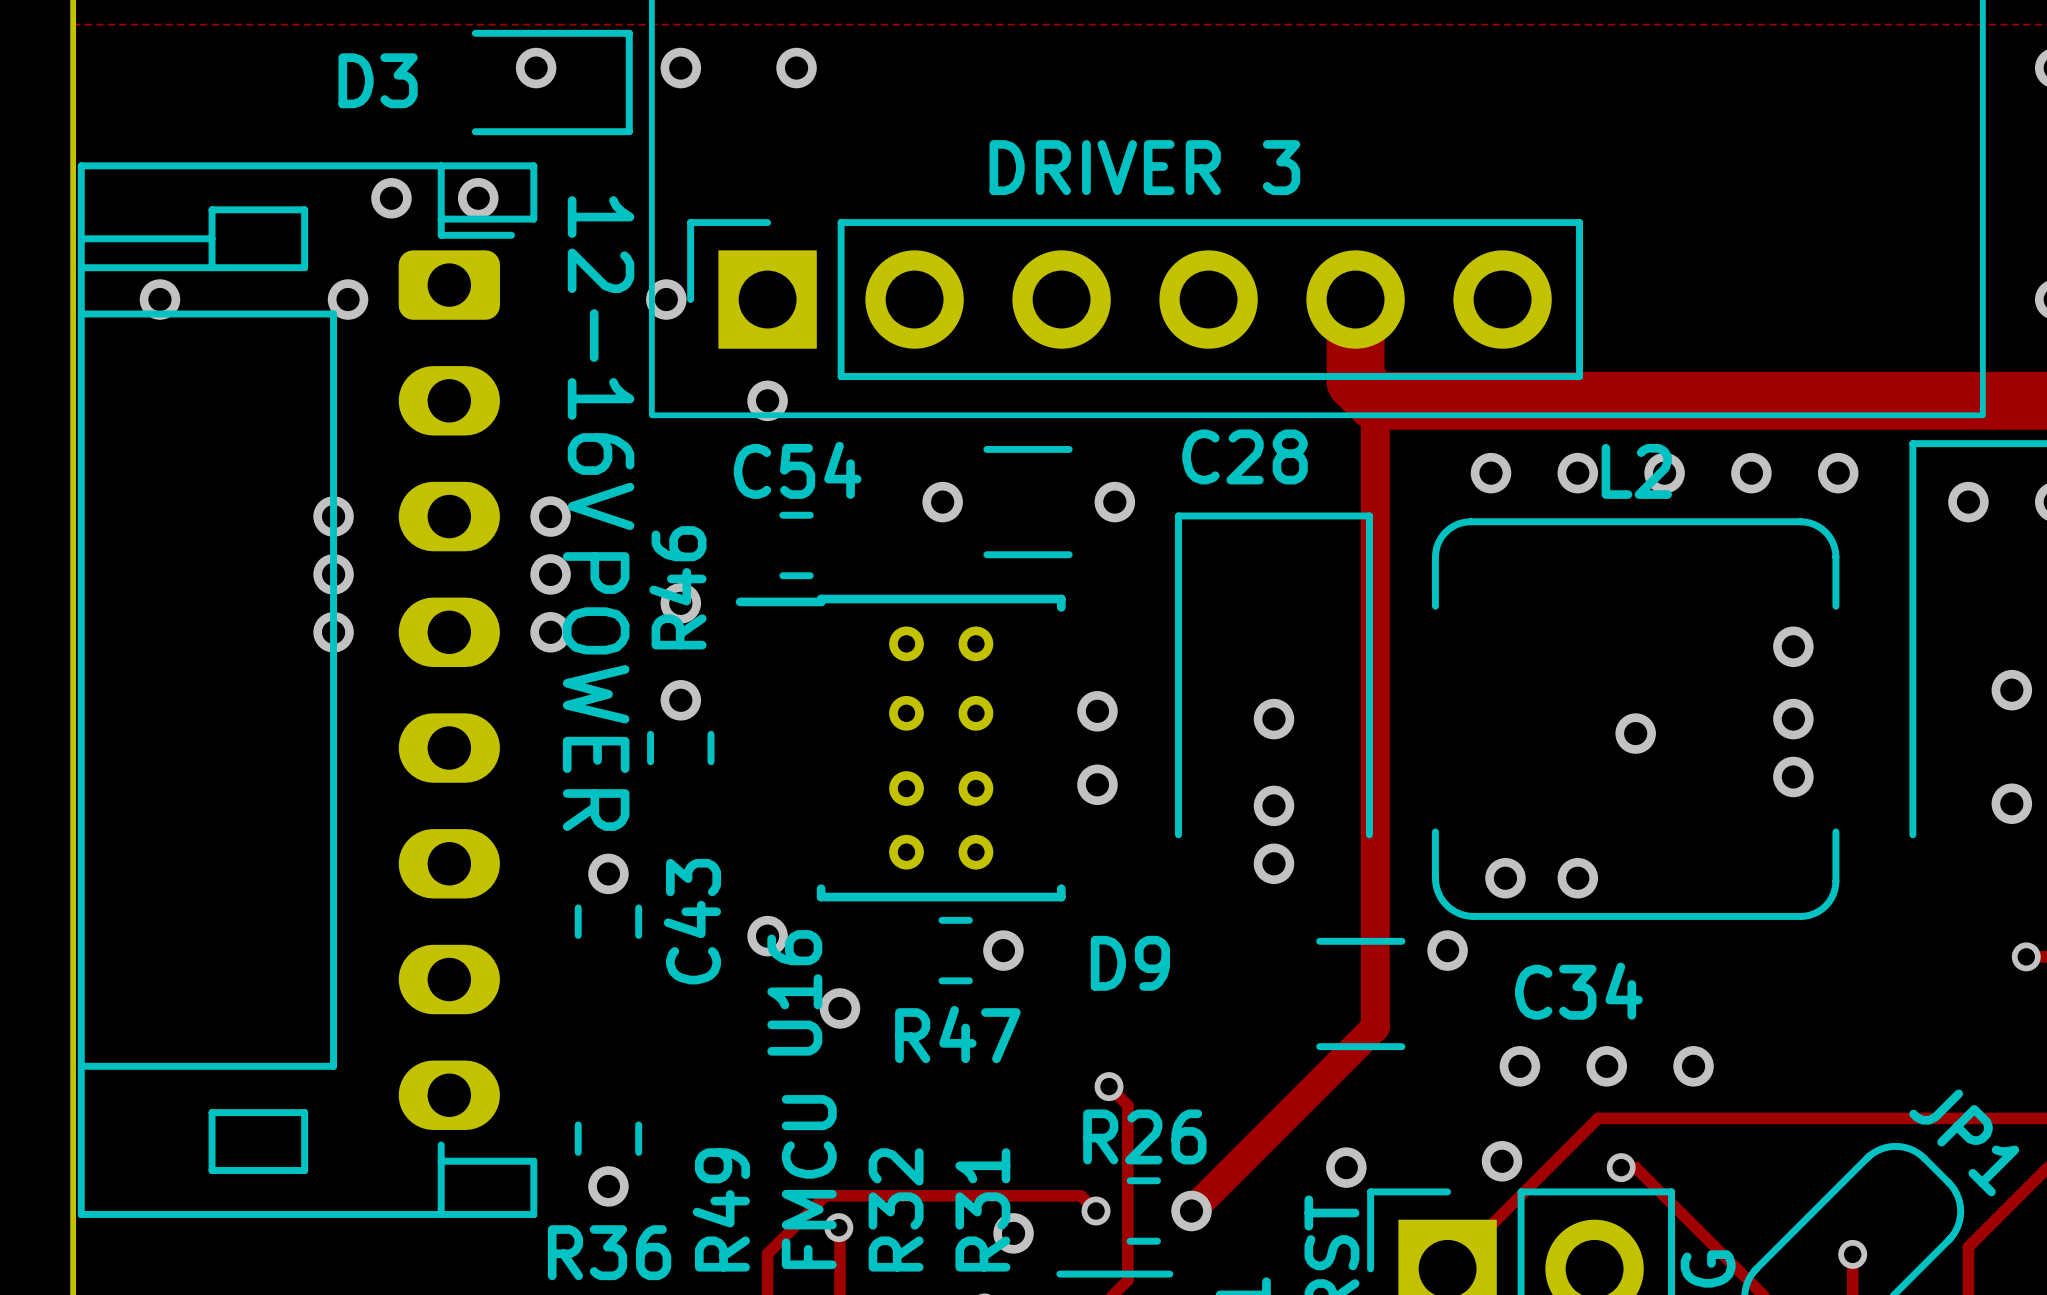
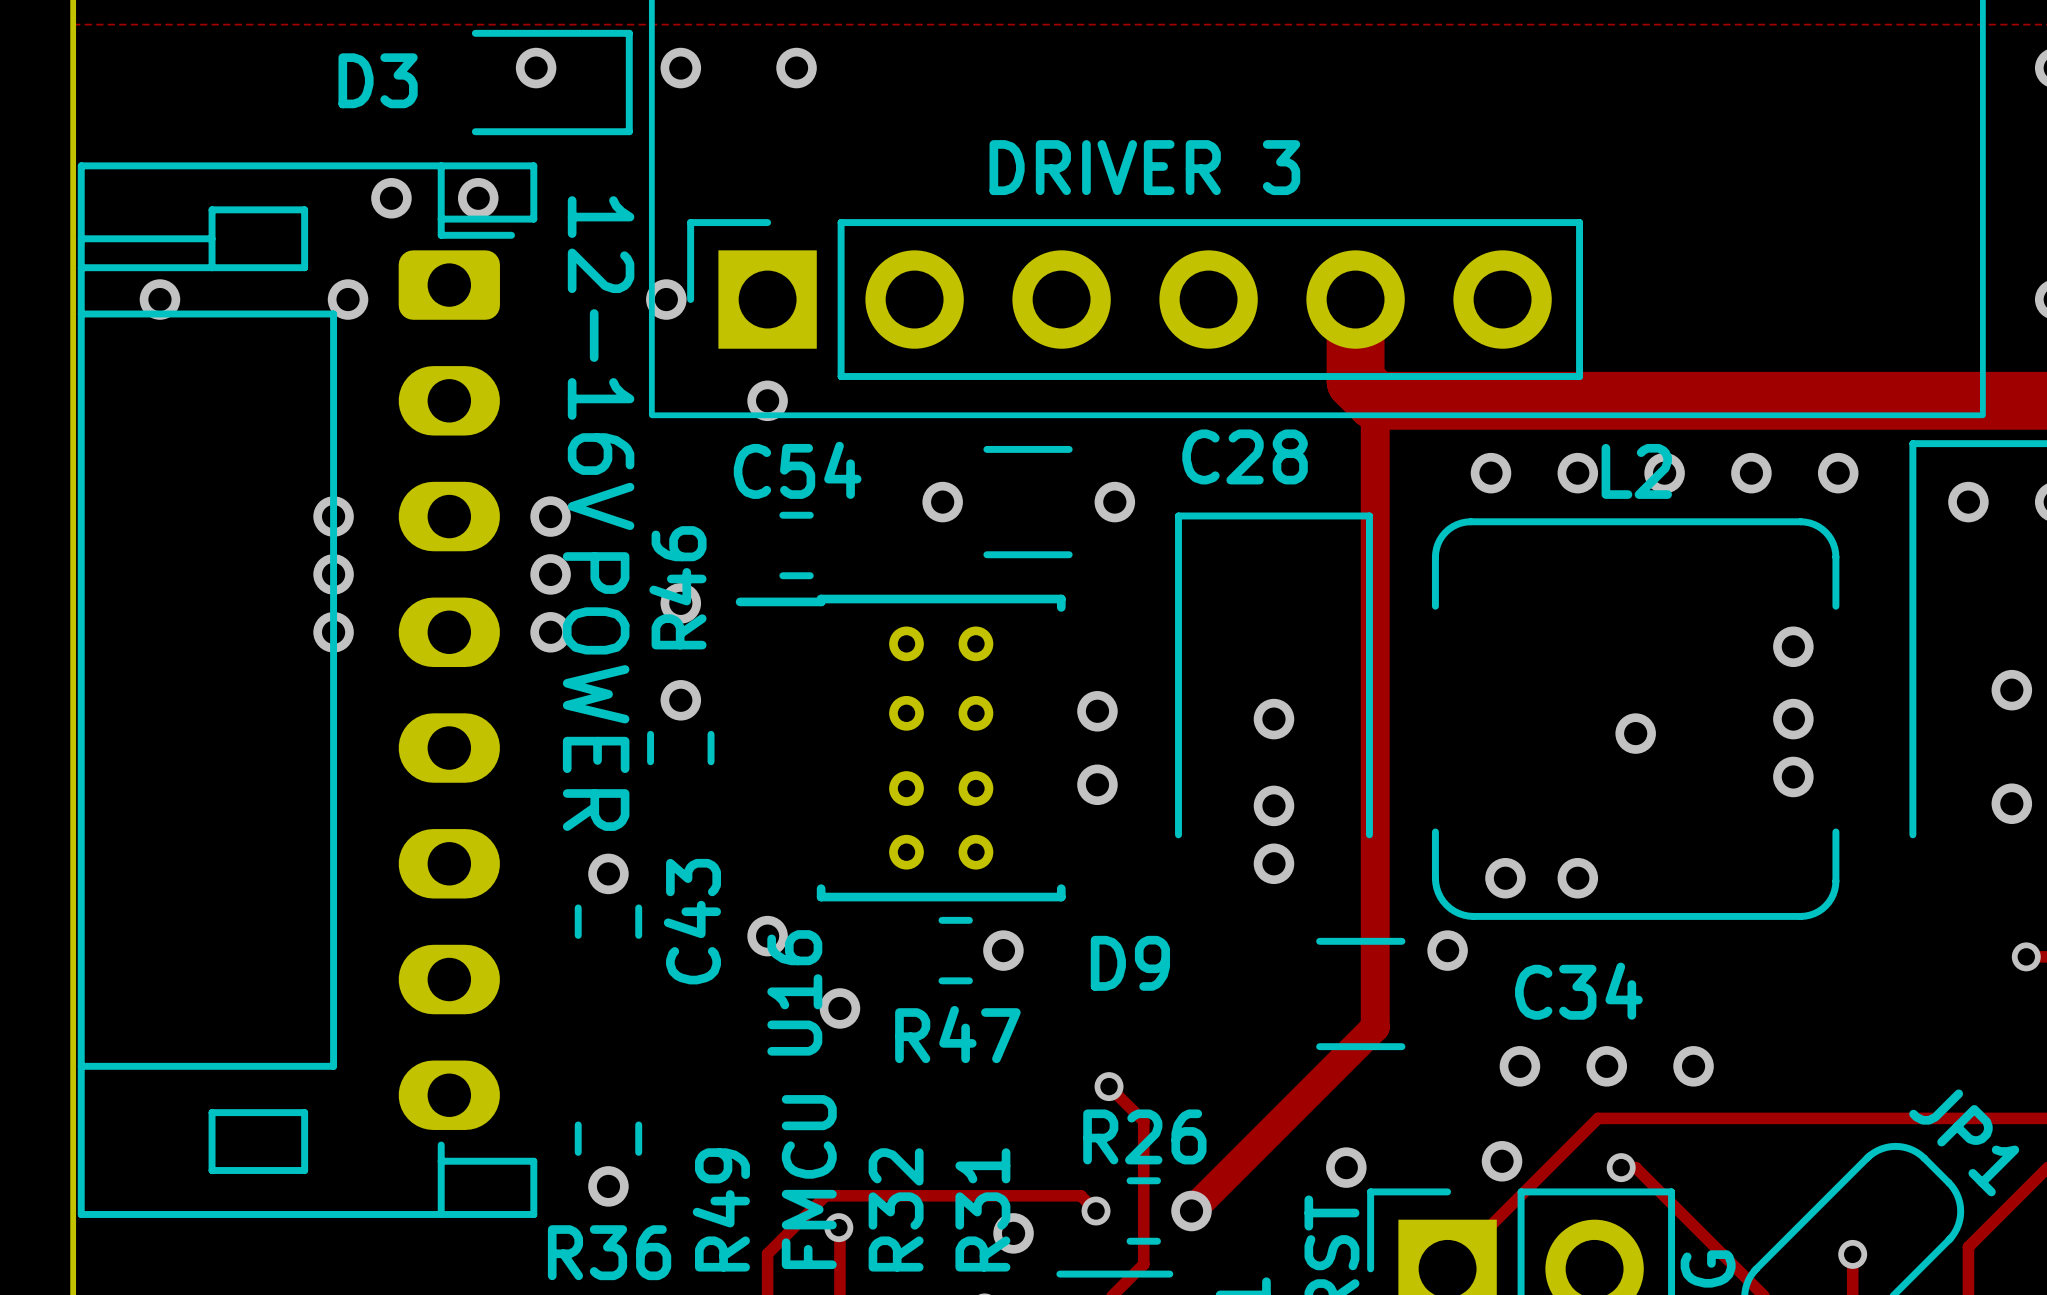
track: (1127, 1105) (1127, 1280) -> (1127, 1105) (1143, 1121) (1143, 1264) (1127, 1280)

